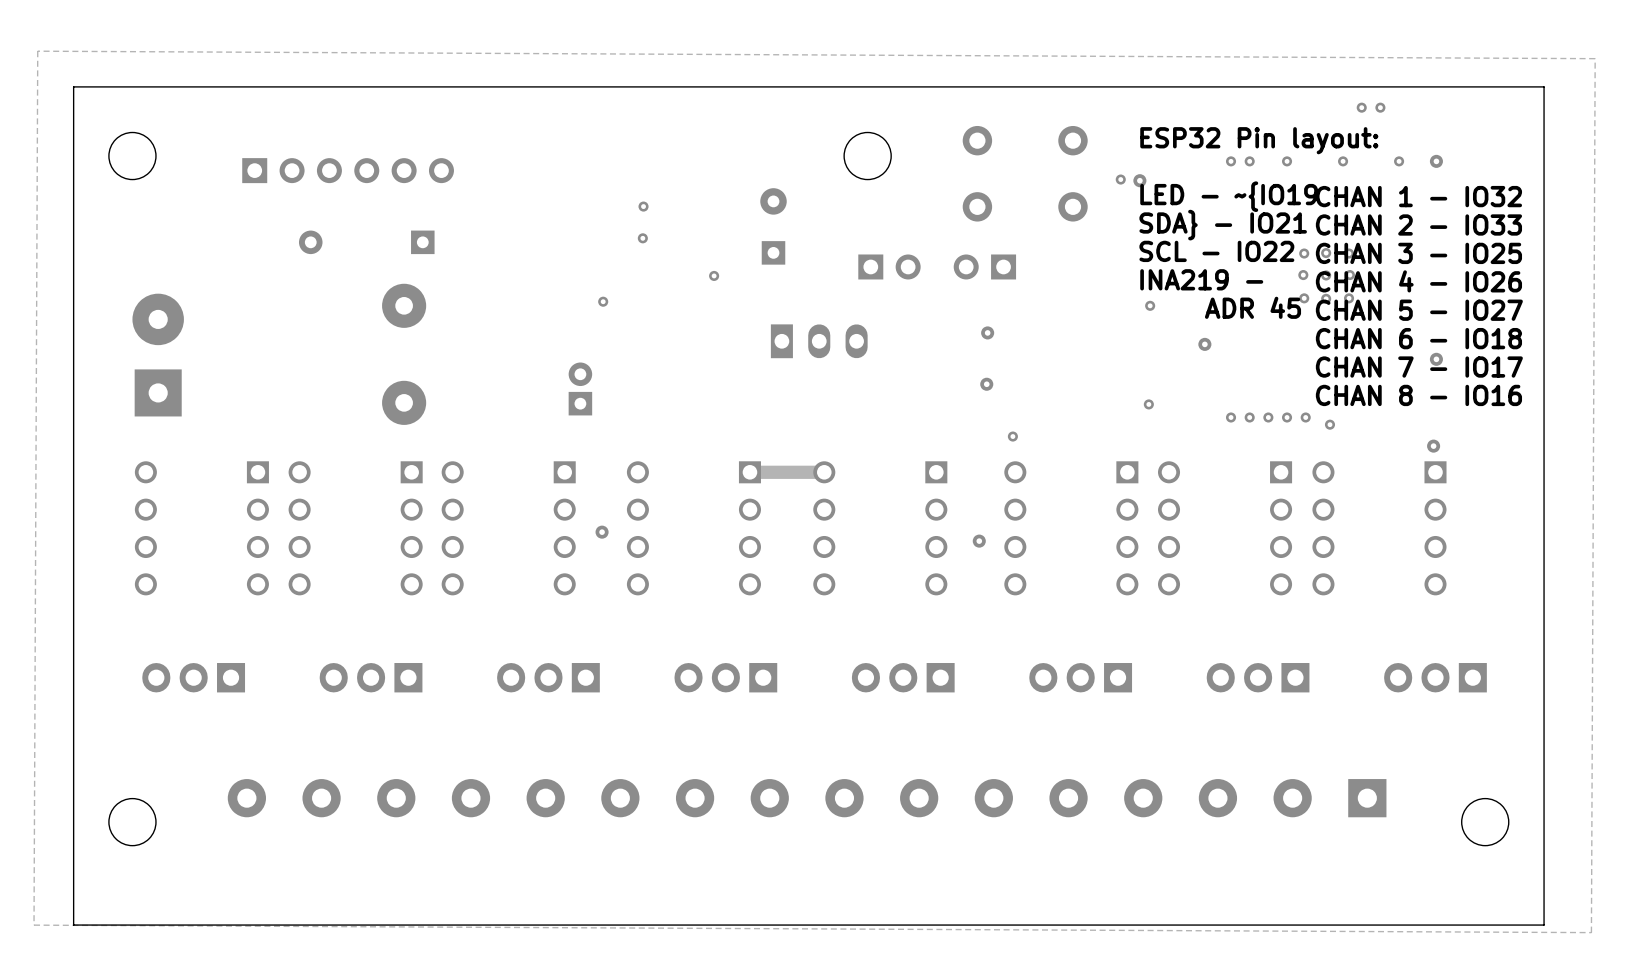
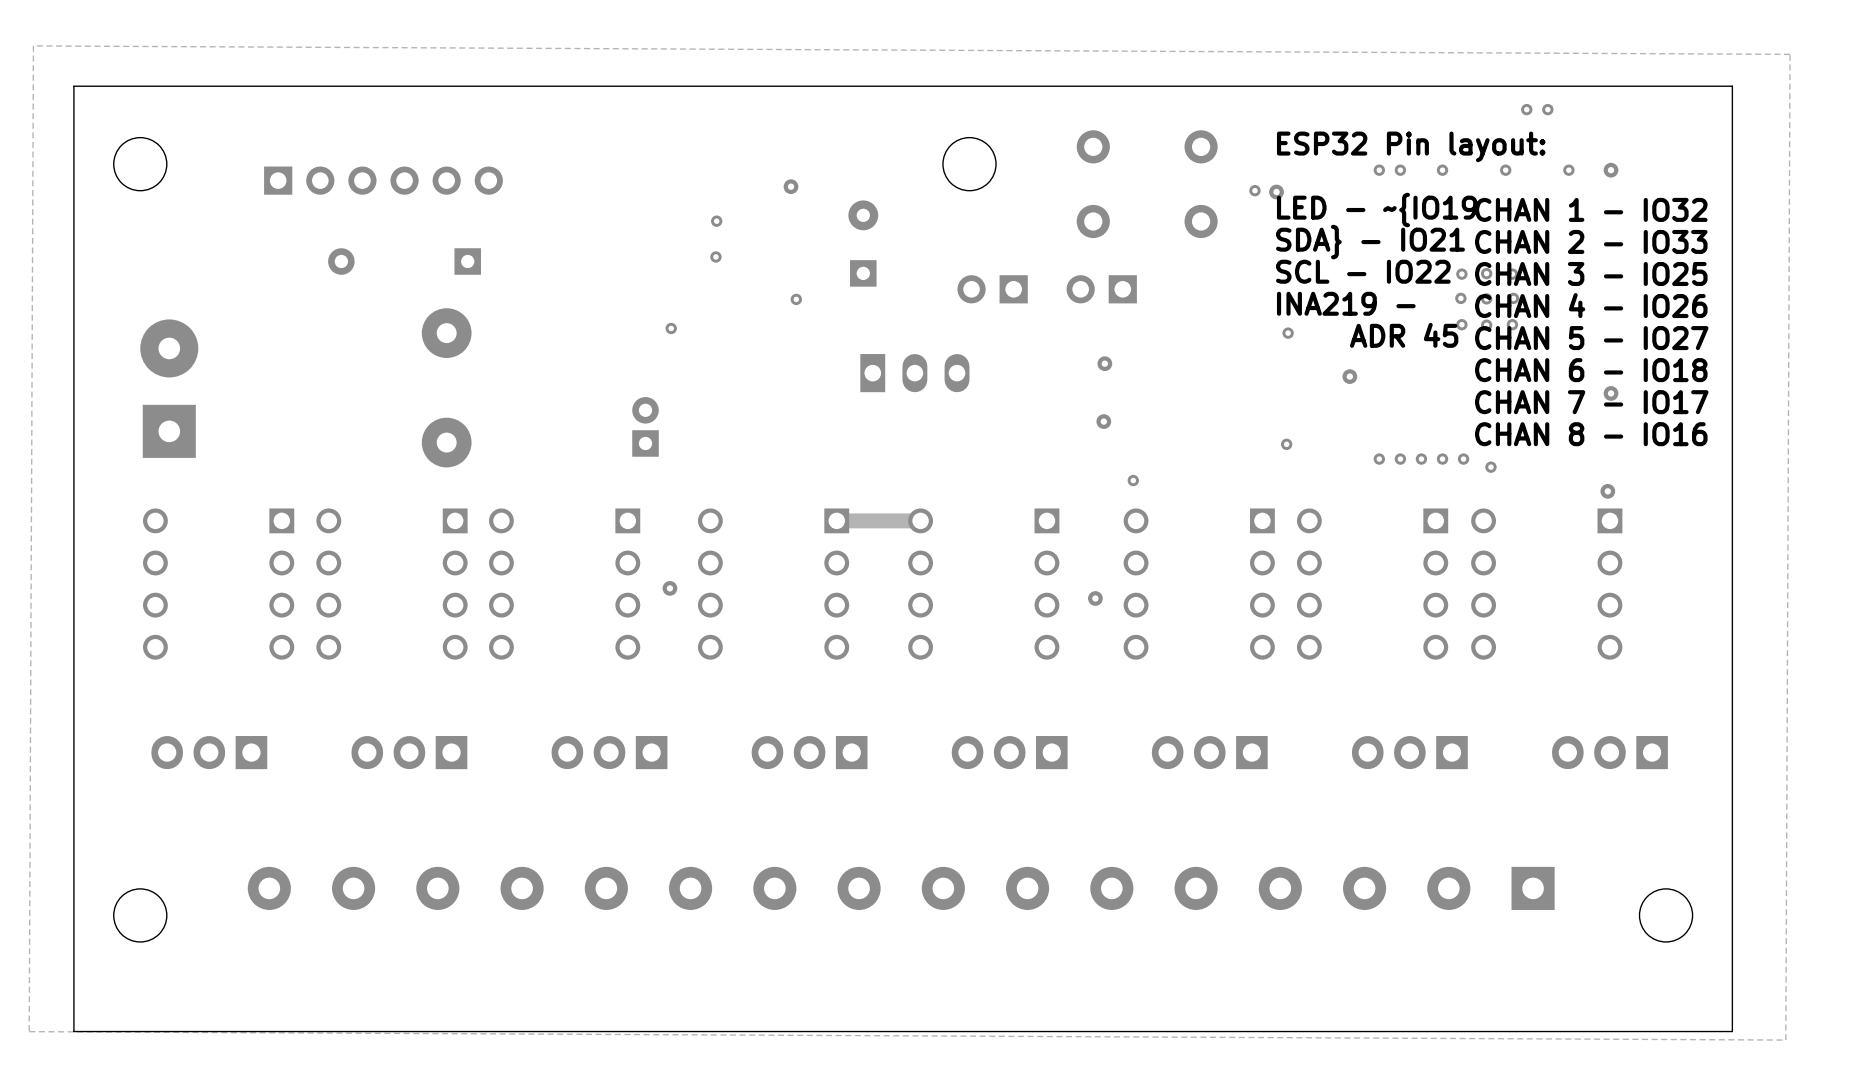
via: none -> (791, 186)
part rotation: 0° (889, 266) -> 180° (992, 289)

